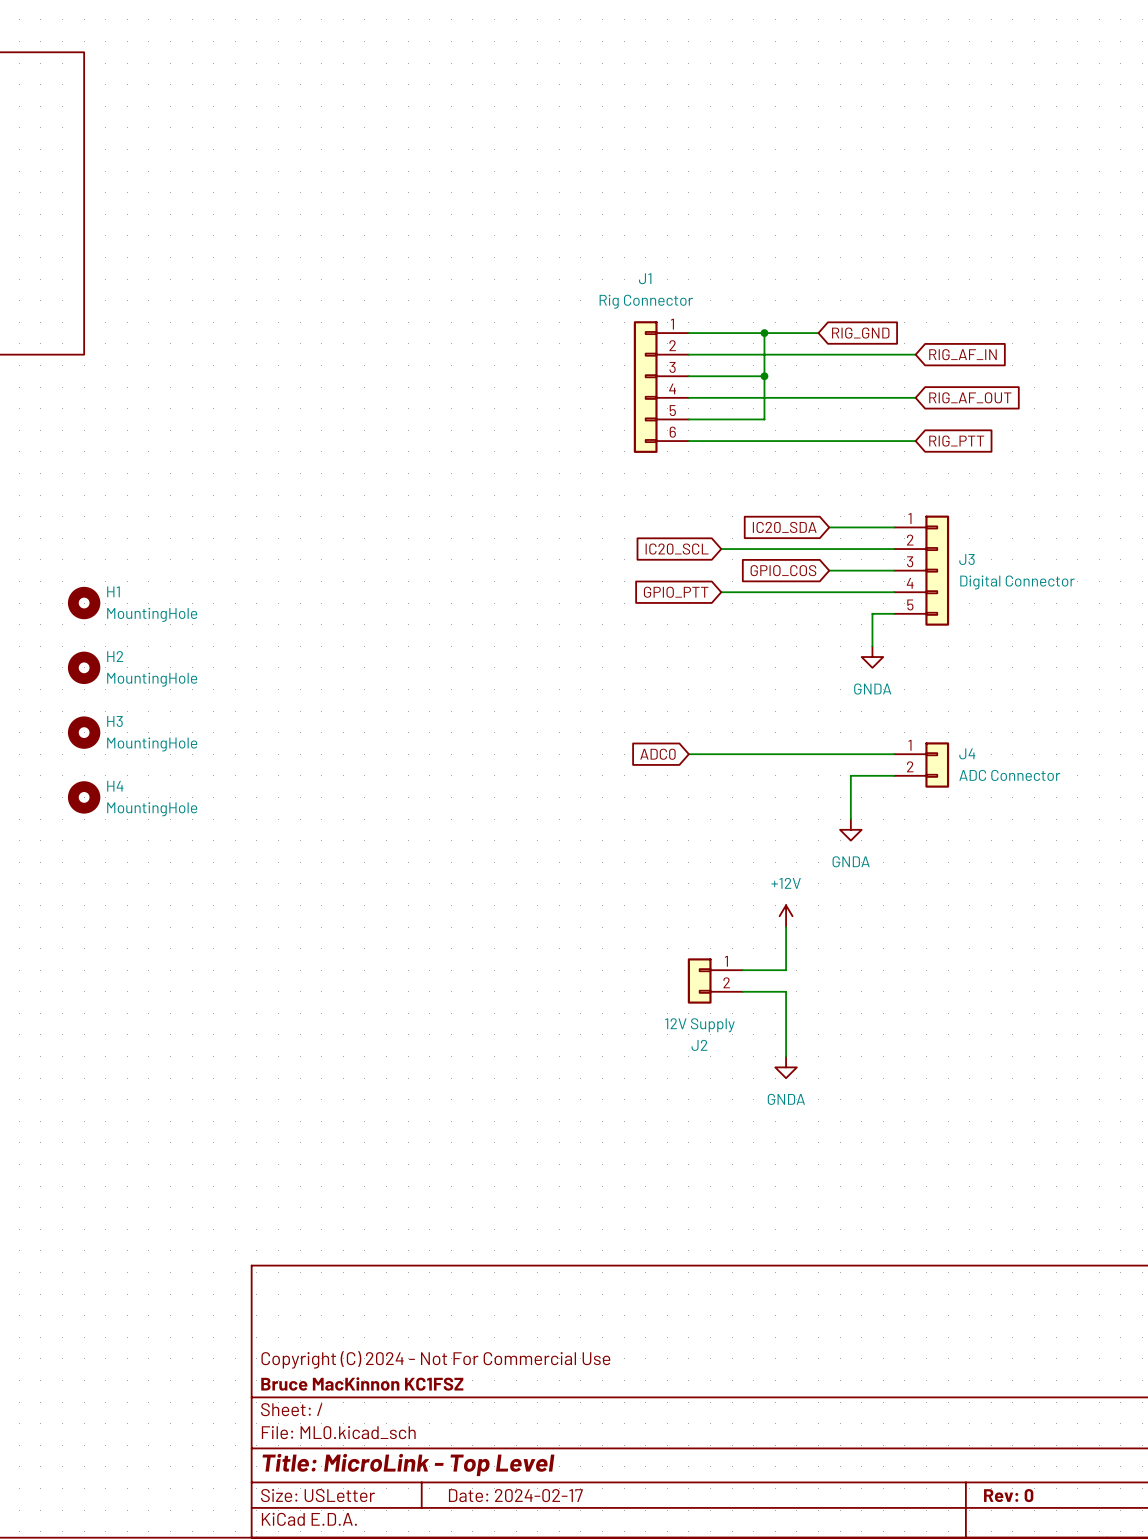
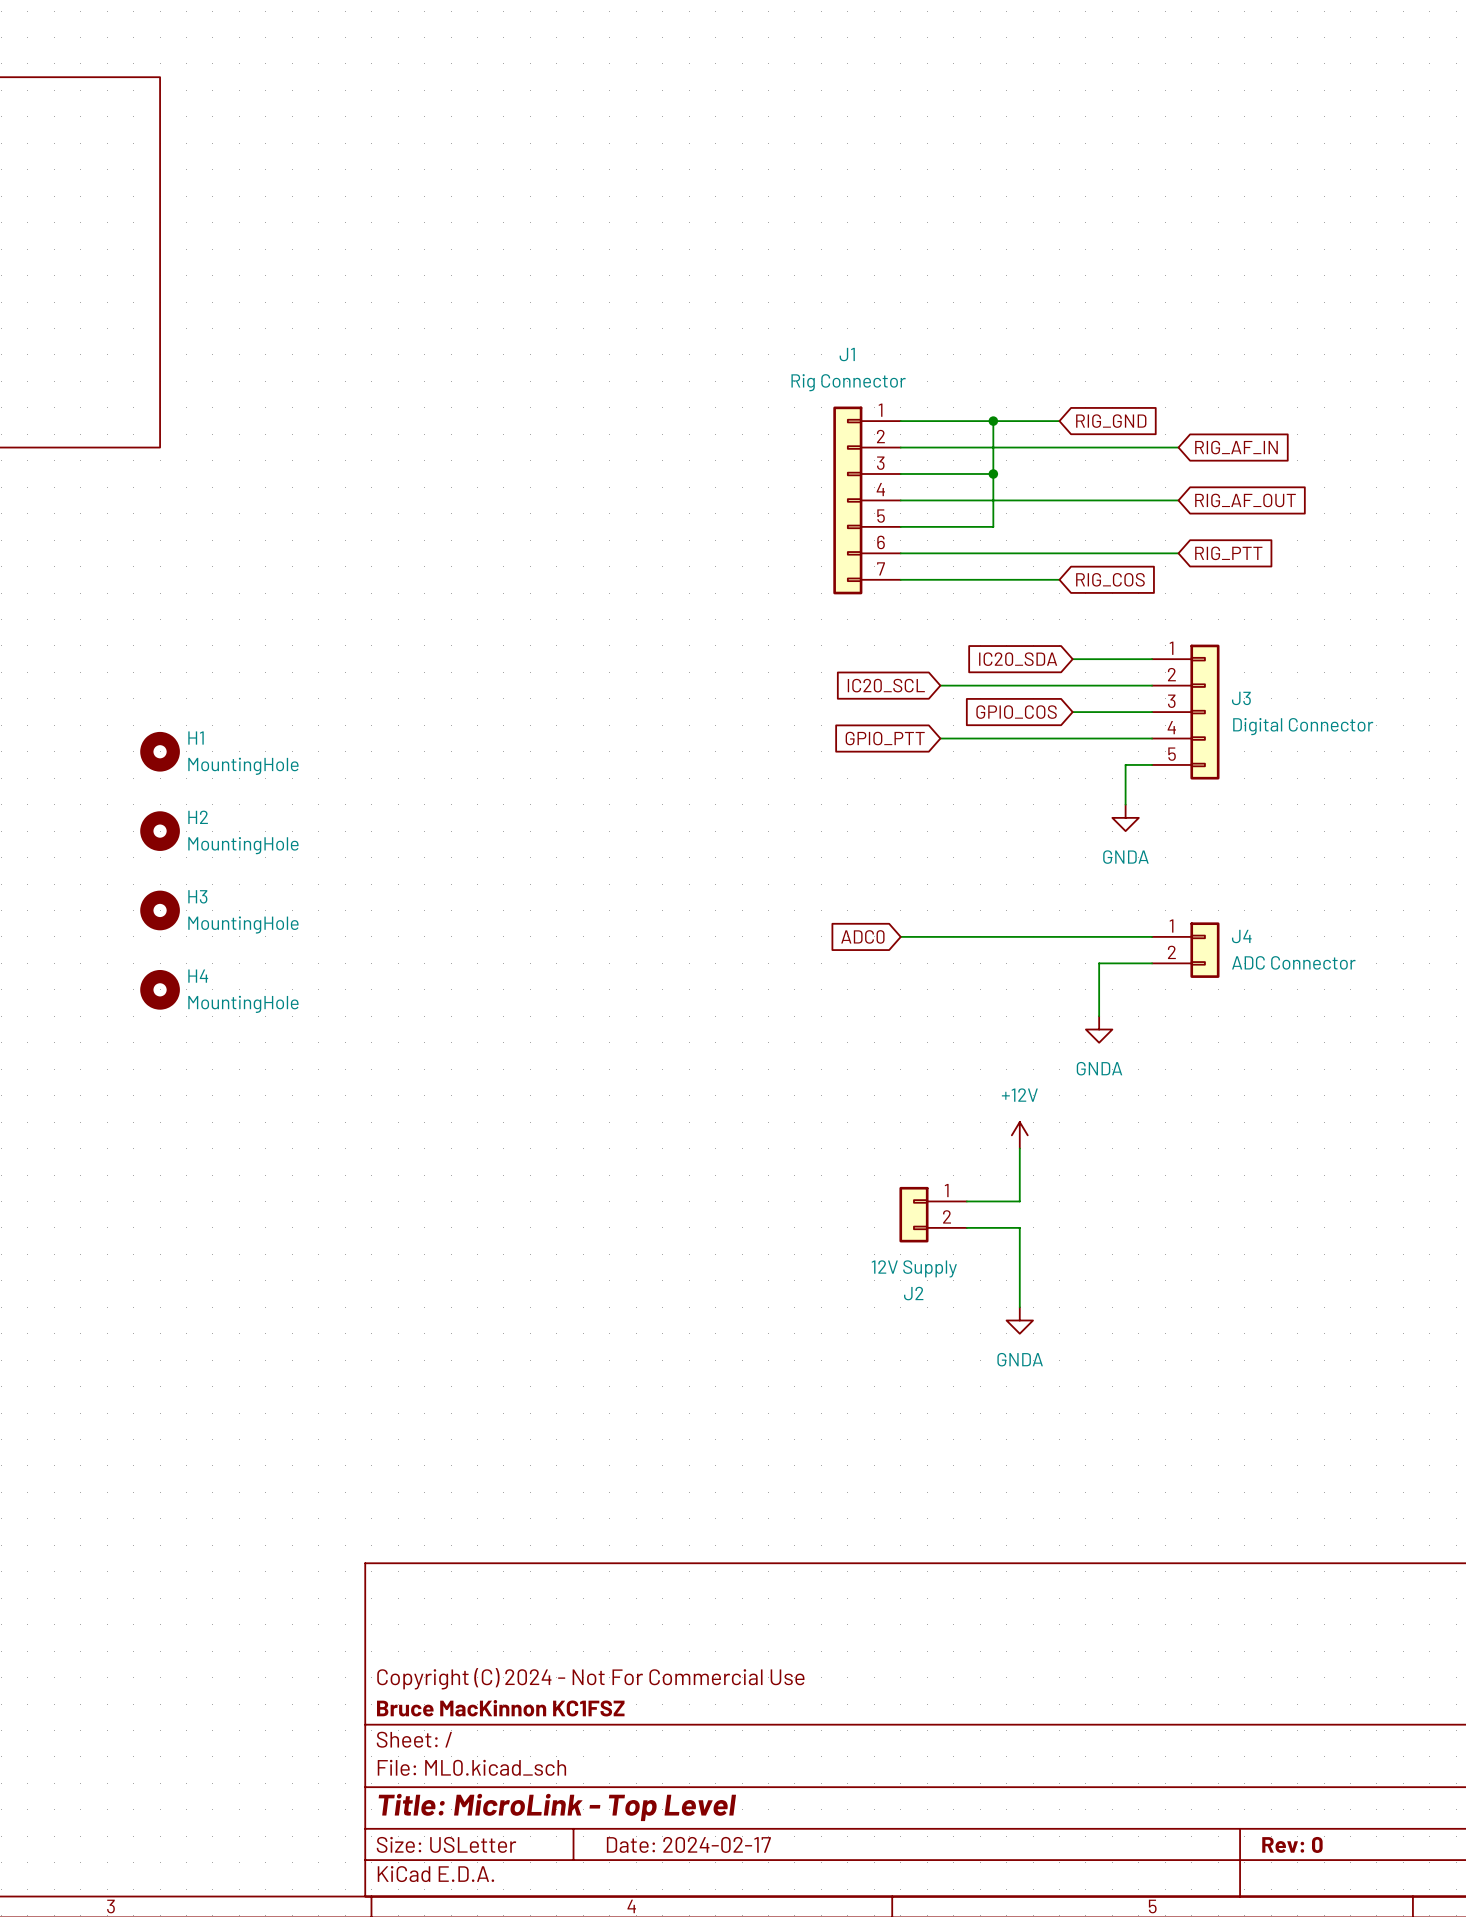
J1 symbol: [633, 321, 689, 453] -> [833, 406, 901, 595]
wire: none -> (900, 579) (1059, 579)
global label: none -> RIG_COS (1110, 579)

